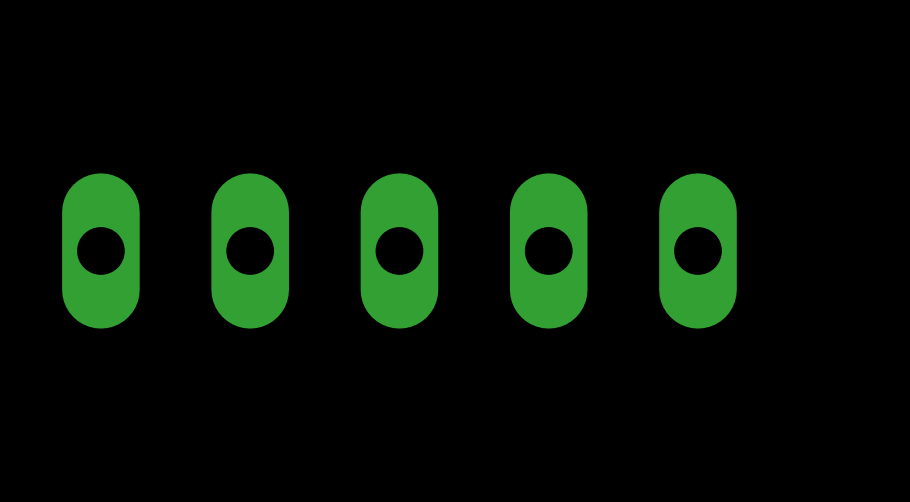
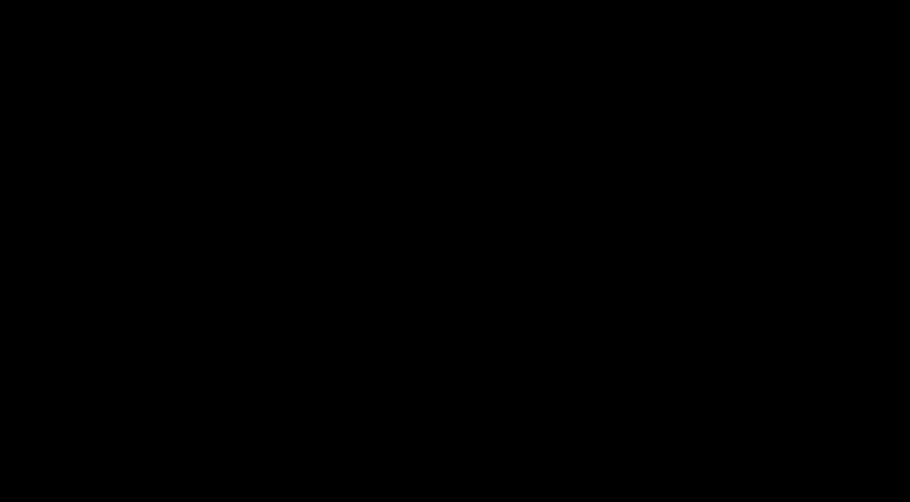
part: (399, 250) -> none

